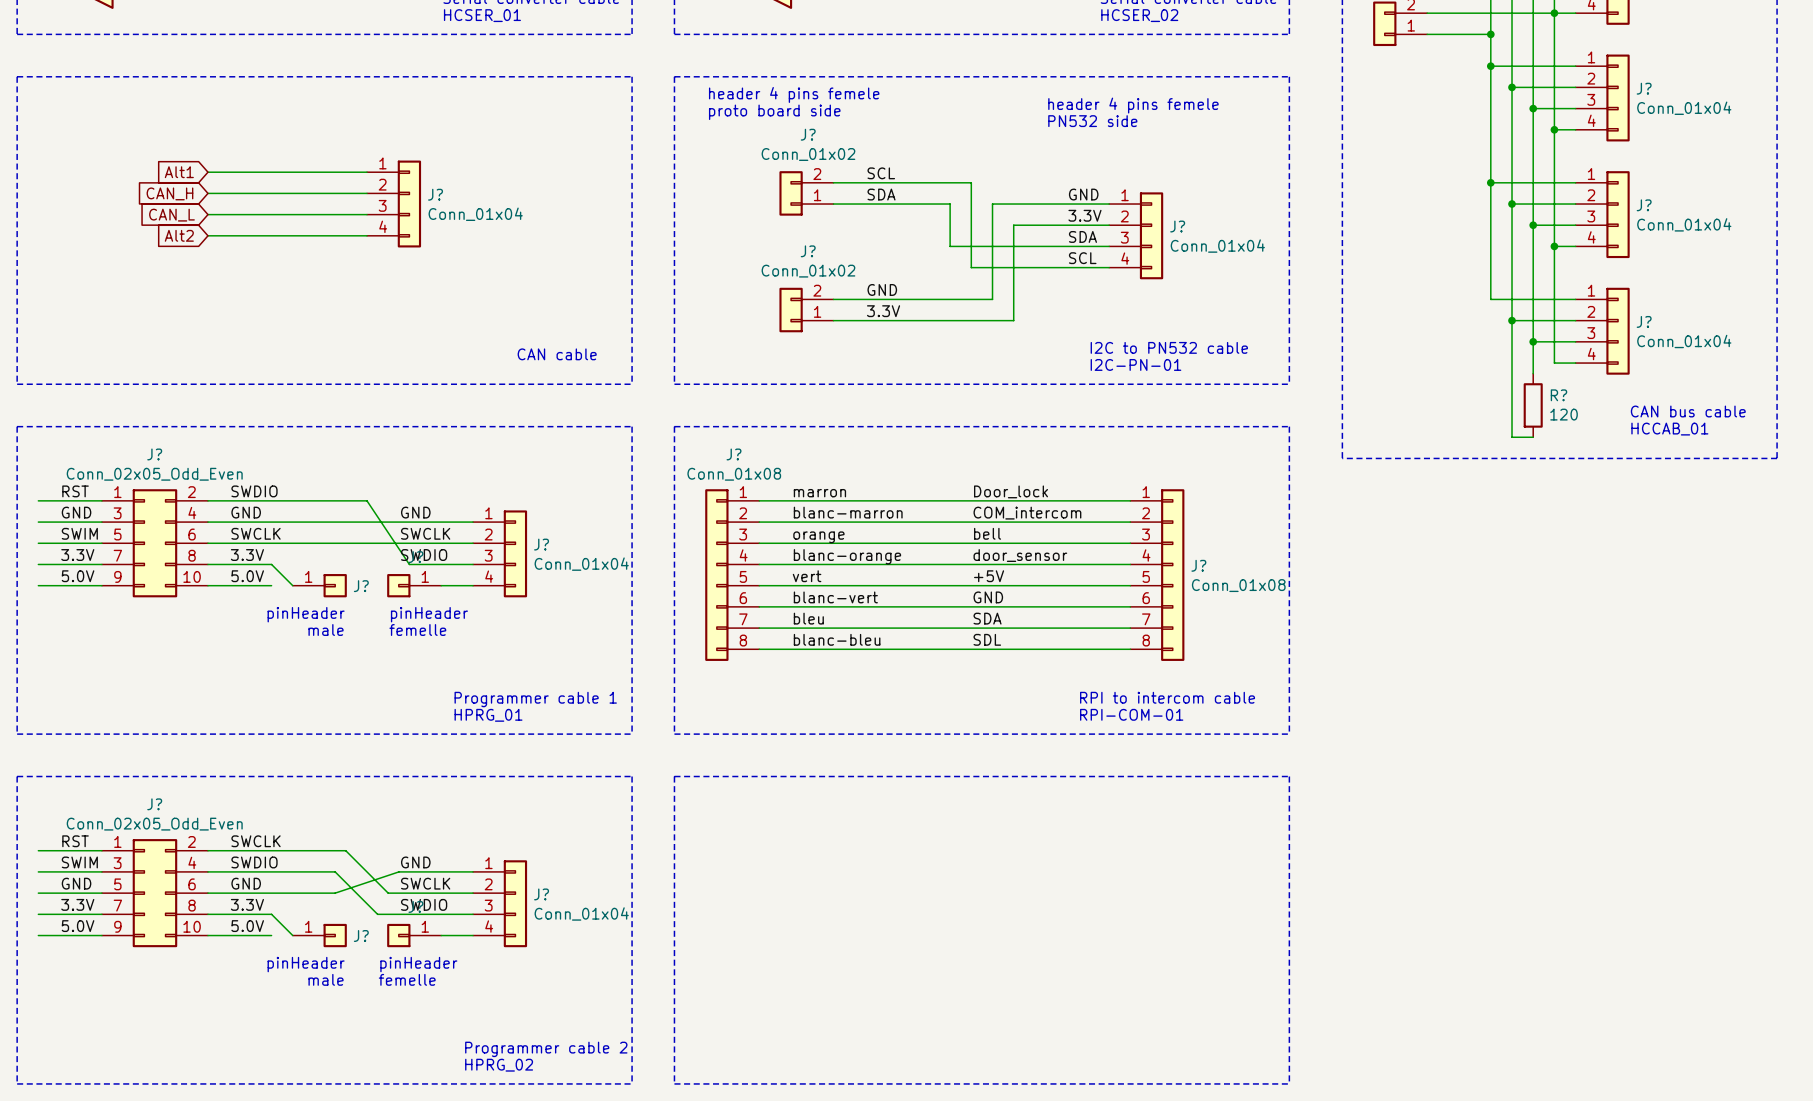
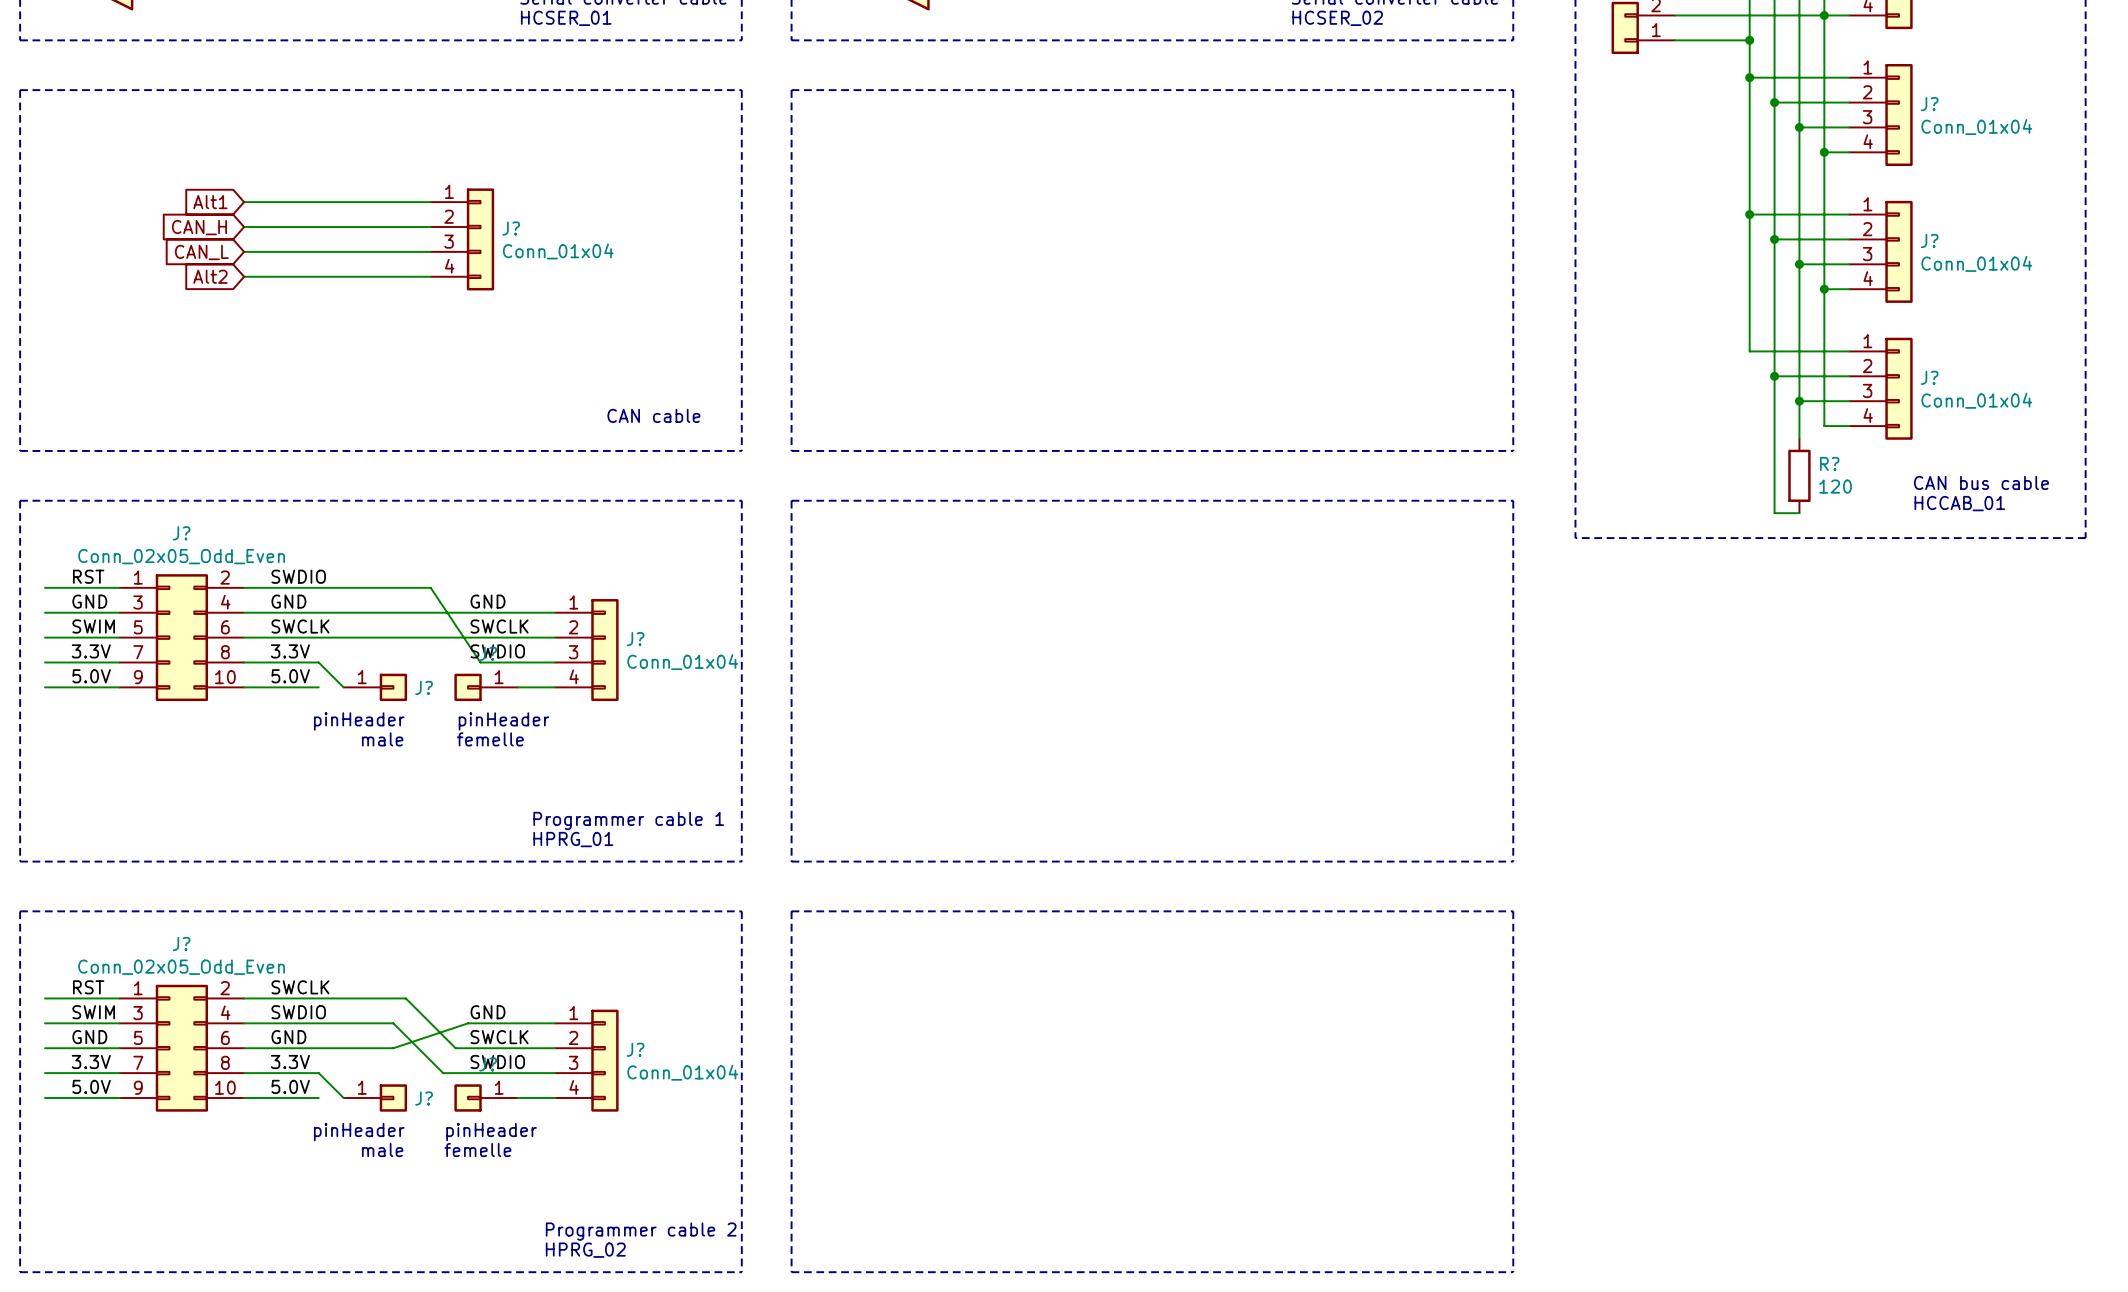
text: header 4 pins femele (794, 94) -> none
text: header 4 pins femele (1133, 105) -> none
text: proto board side (774, 112) -> none
text: PN532 side (1092, 121) -> none
label: SCL (881, 173) -> none
wire: (833, 182) (971, 182) (971, 267) (1109, 267) -> none
J?: Conn_01x02 (806, 193) -> none
label: SDA (881, 194) -> none
label: GND (1083, 194) -> none
wire: (833, 204) (950, 204) (950, 246) (1109, 246) -> none
wire: (1109, 204) (992, 204) (992, 299) (833, 299) -> none
label: 3.3V (1084, 215) -> none
wire: (1109, 225) (1013, 225) (1013, 320) (833, 320) -> none
J?: Conn_01x04 (1136, 235) -> none
label: SDA (1082, 236) -> none
label: SCL (1082, 258) -> none
label: GND (882, 289) -> none
J?: Conn_01x02 (806, 310) -> none
label: 3.3V (883, 311) -> none
text: I2C to PN532 cable (1169, 347) -> none
text: I2C-PN-01 (1135, 364) -> none
label: Door_lock (1011, 491) -> none
label: marron (819, 493) -> none
wire: (759, 500) (1130, 500) -> none
label: blanc-marron (848, 512) -> none
label: COM_intercom (1027, 513) -> none
wire: (759, 522) (1130, 522) -> none
label: bell (987, 533) -> none
label: orange (818, 537) -> none
wire: (759, 543) (1130, 543) -> none
label: door_sensor (1020, 555) -> none
label: blanc-orange (847, 556) -> none
wire: (759, 564) (1130, 564) -> none
J?: Conn_01x08 (732, 575) -> none
J?: Conn_01x08 (1157, 575) -> none
label: vert (807, 576) -> none
label: +5V (989, 576) -> none
wire: (759, 585) (1130, 585) -> none
label: blanc-vert (835, 597) -> none
label: GND (988, 597) -> none
wire: (759, 606) (1130, 606) -> none
label: bleu (808, 618) -> none
label: SDA (987, 618) -> none
wire: (759, 628) (1130, 628) -> none
label: blanc-bleu (837, 639) -> none
label: SDL (987, 639) -> none
wire: (759, 649) (1130, 649) -> none
text: RPI to intercom cable (1167, 697) -> none
text: RPI-COM-01 (1131, 714) -> none

